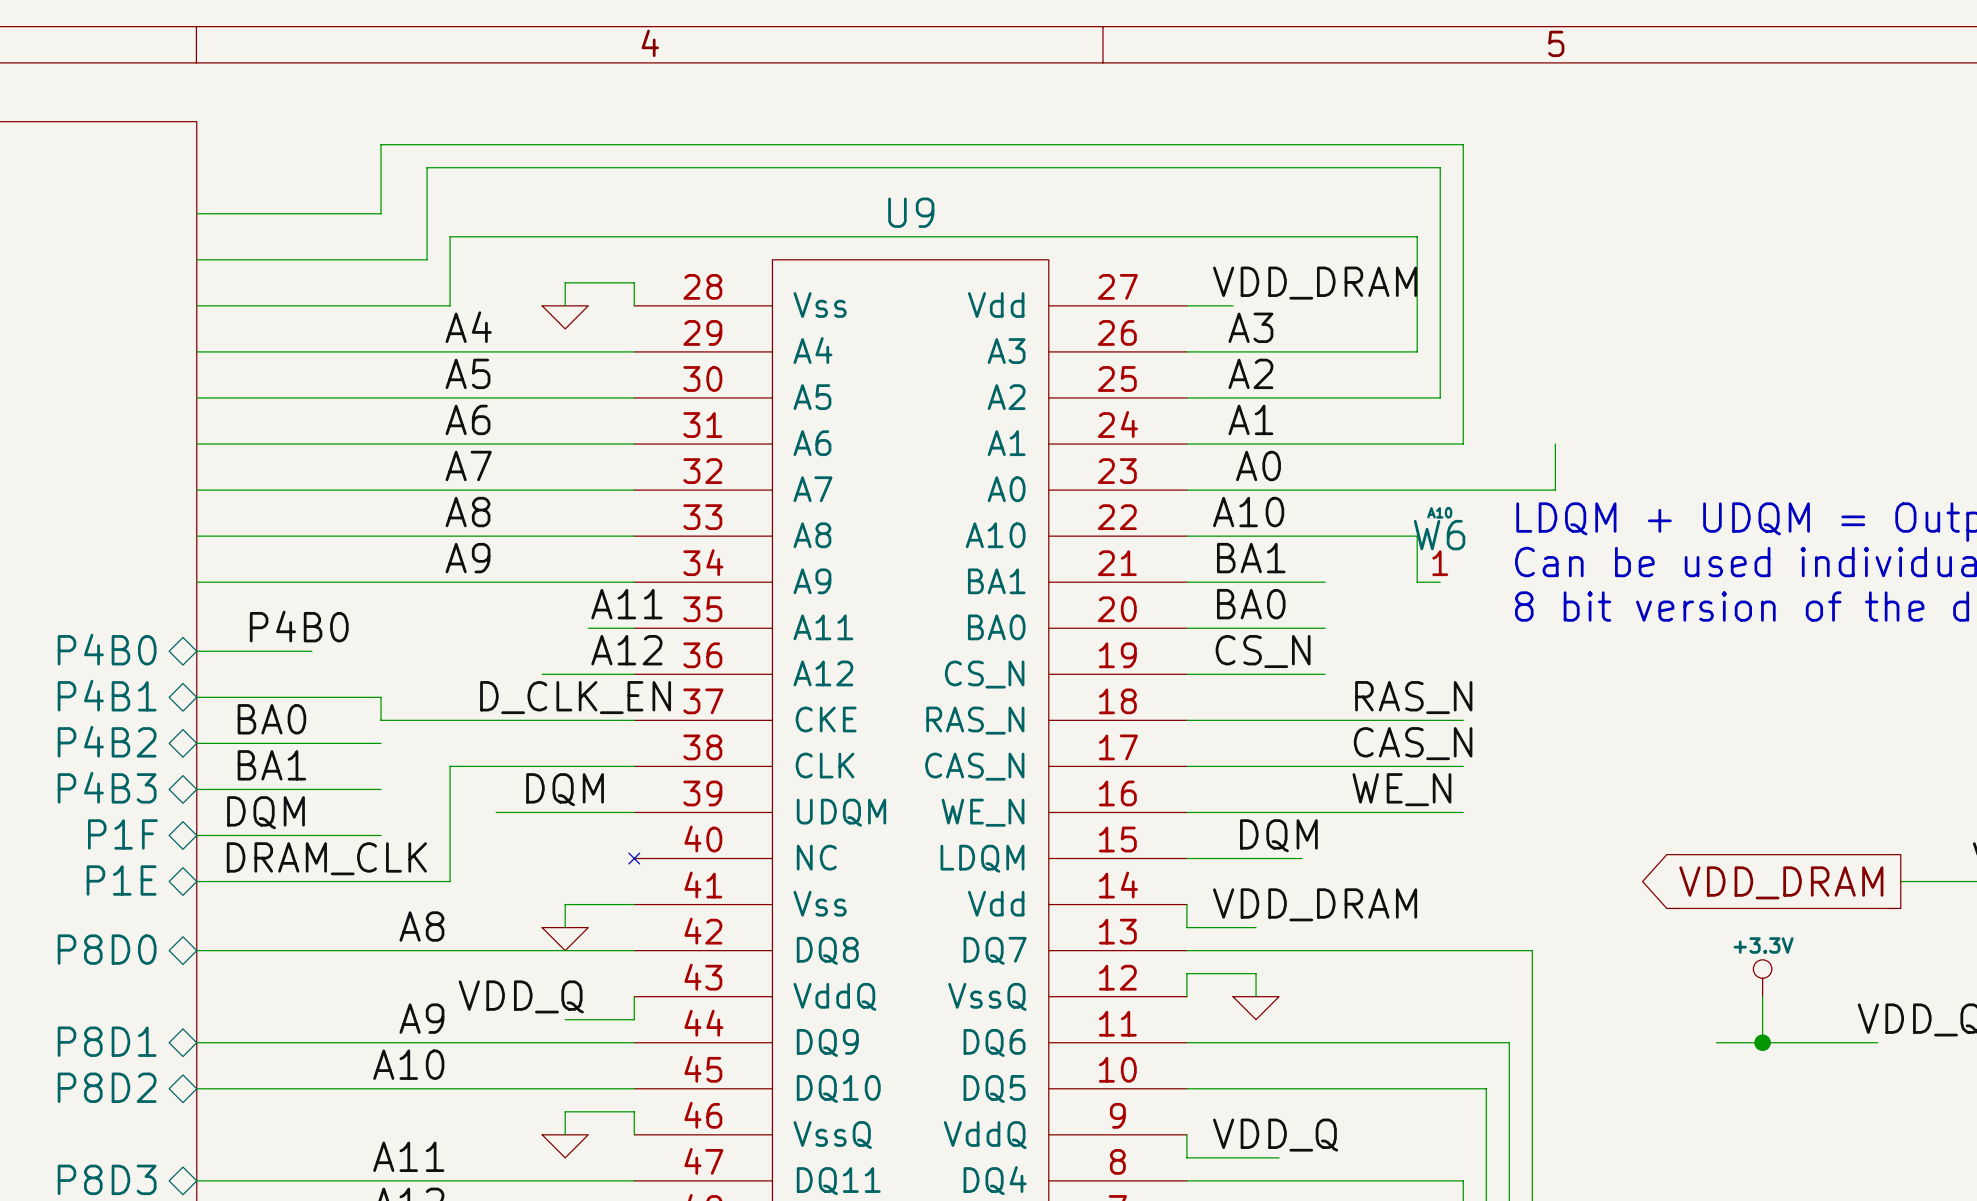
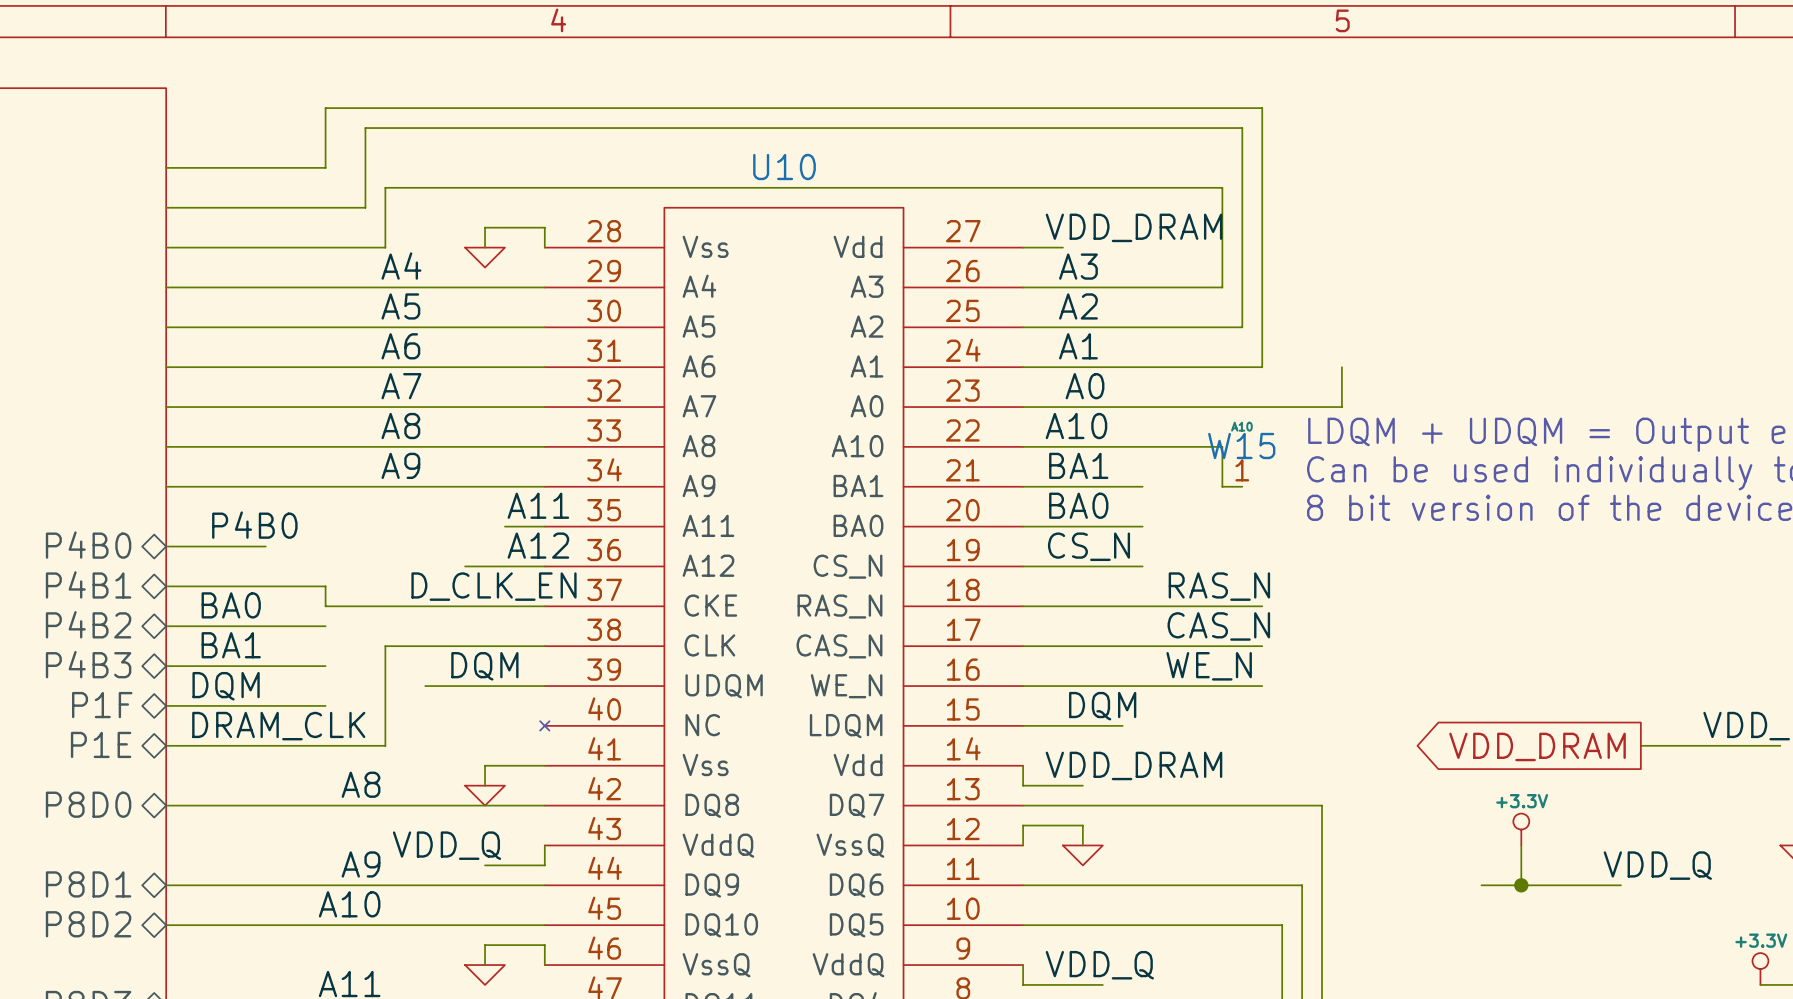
U9 name: U9 (911, 212) -> U10 (784, 166)
W6 name: W6 (1439, 535) -> W15 (1241, 445)

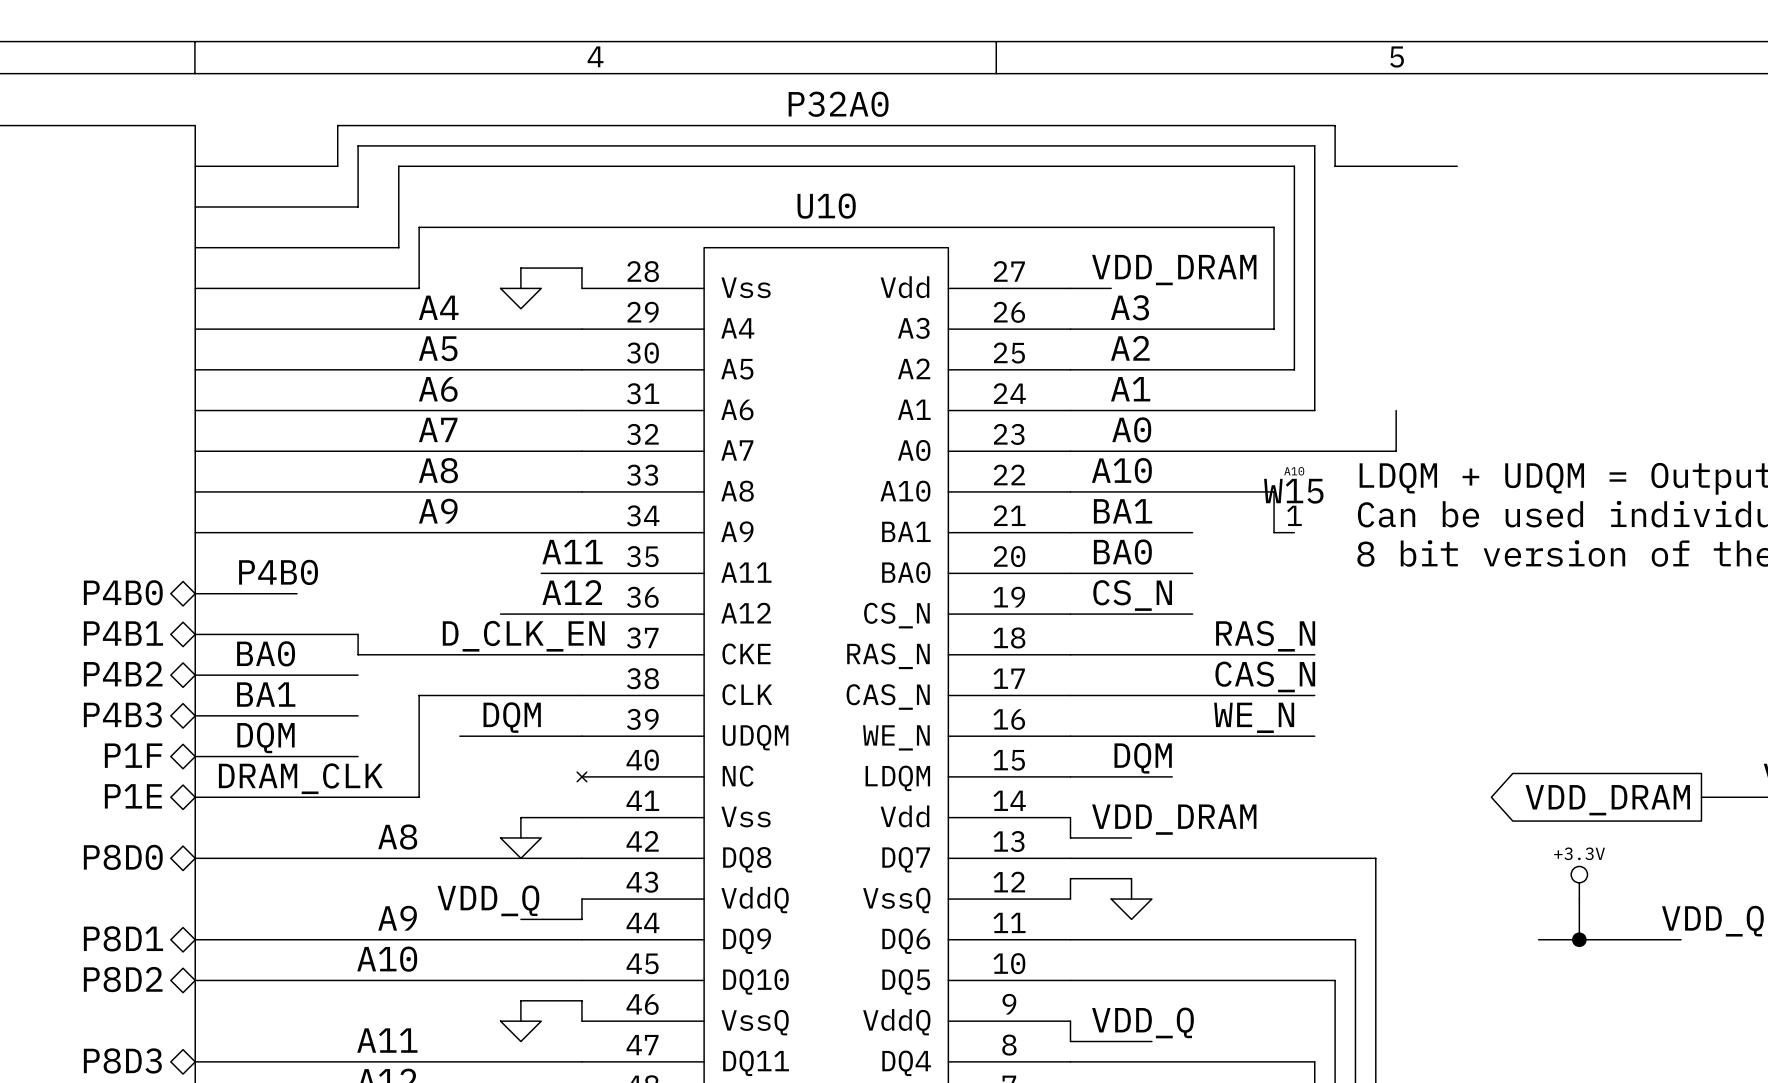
label: none -> P32A0 (838, 104)
wire: none -> (195, 166) (337, 166) (337, 125) (1335, 125) (1335, 166) (1457, 166)

